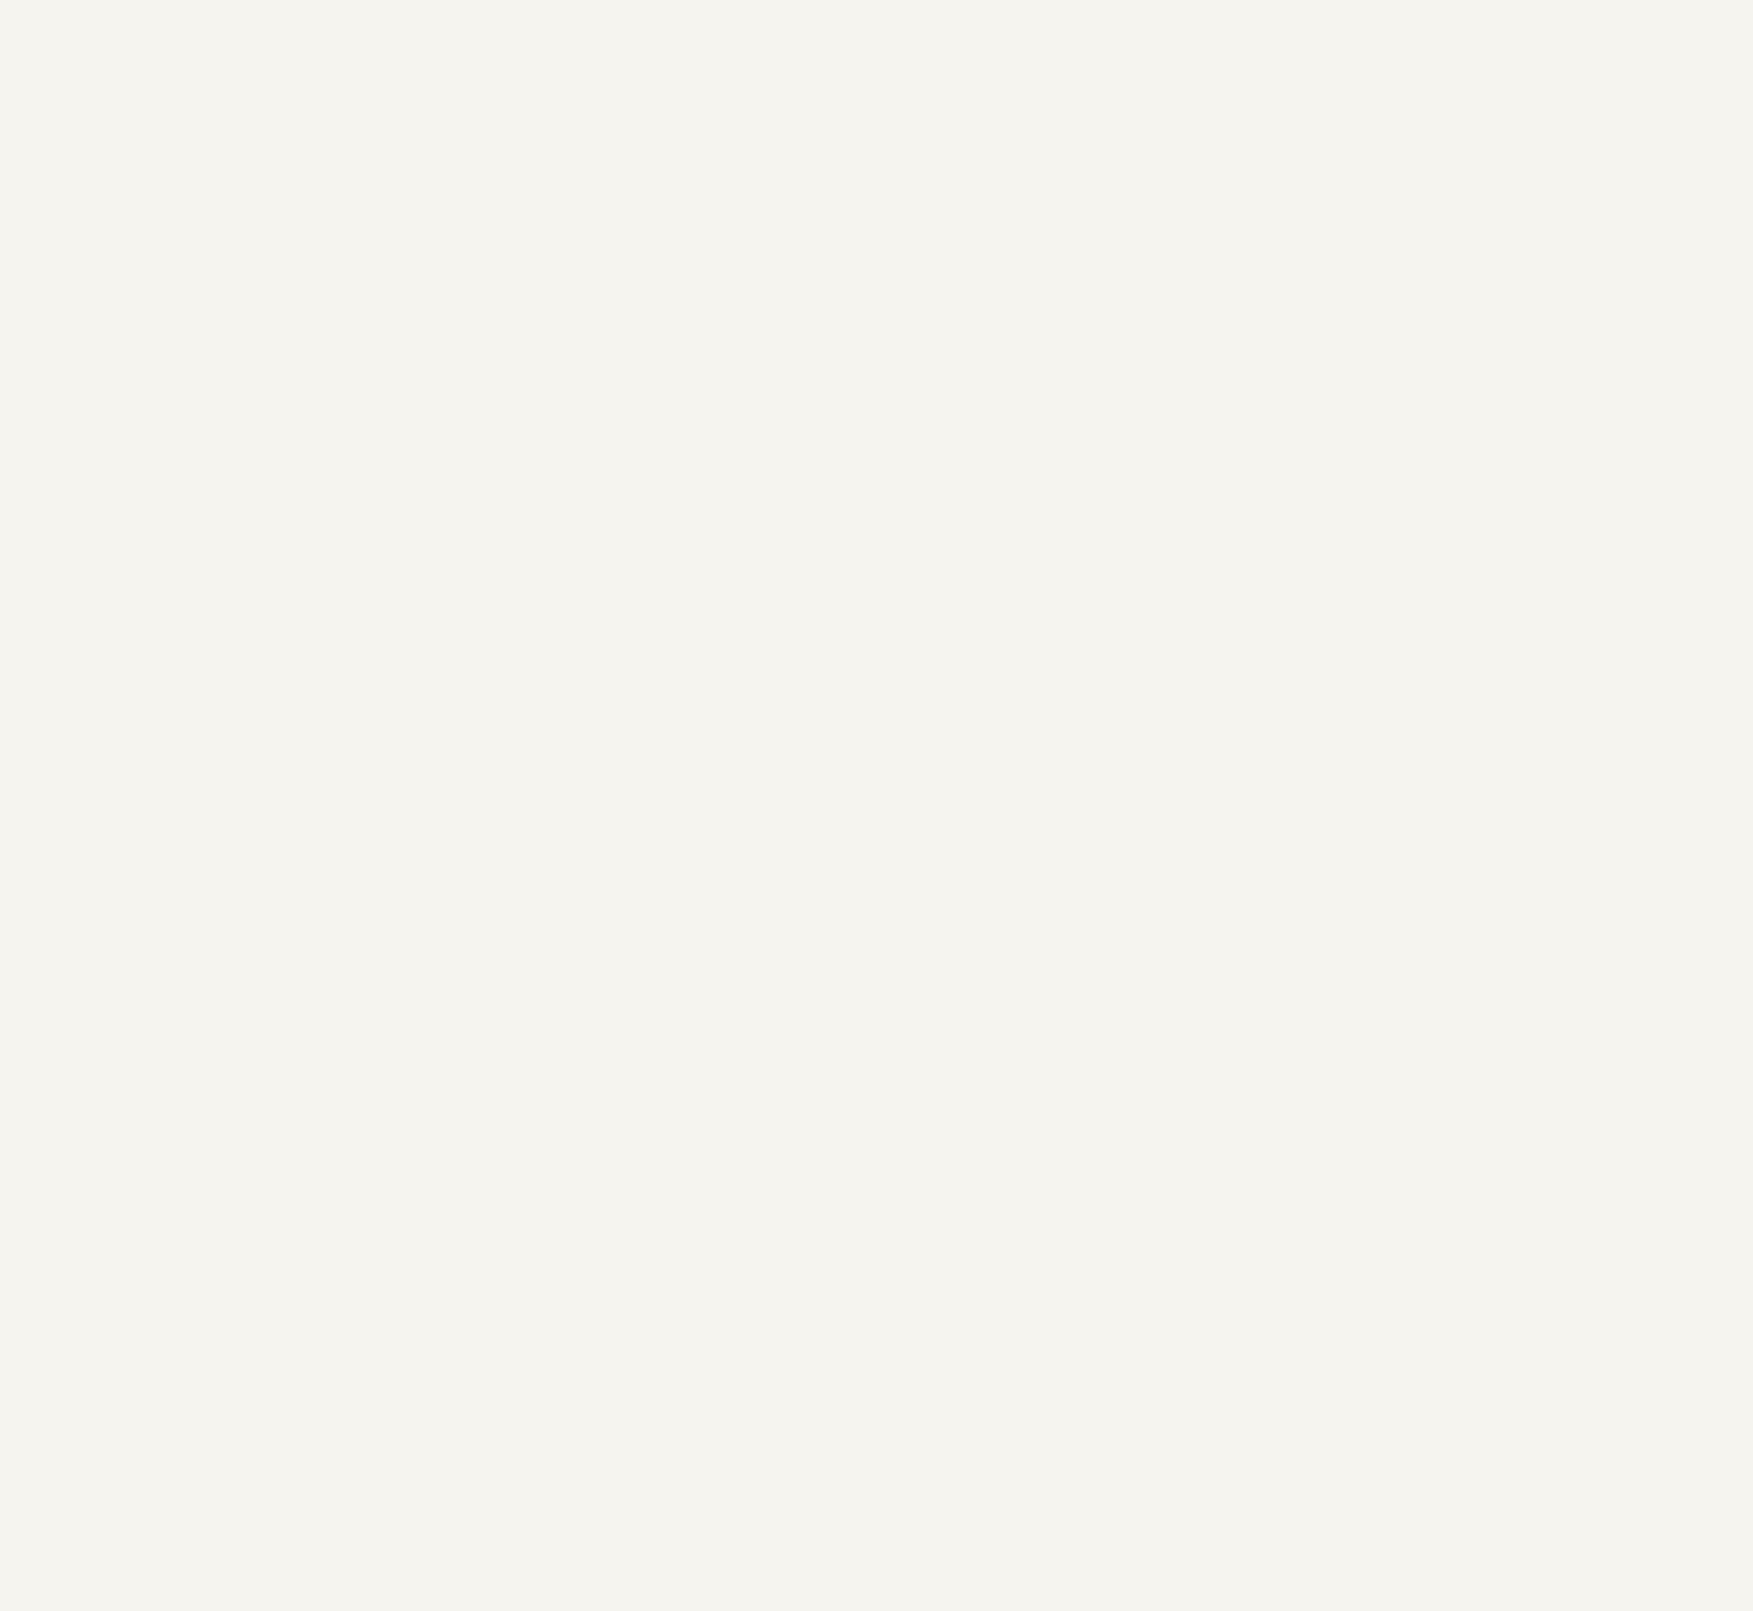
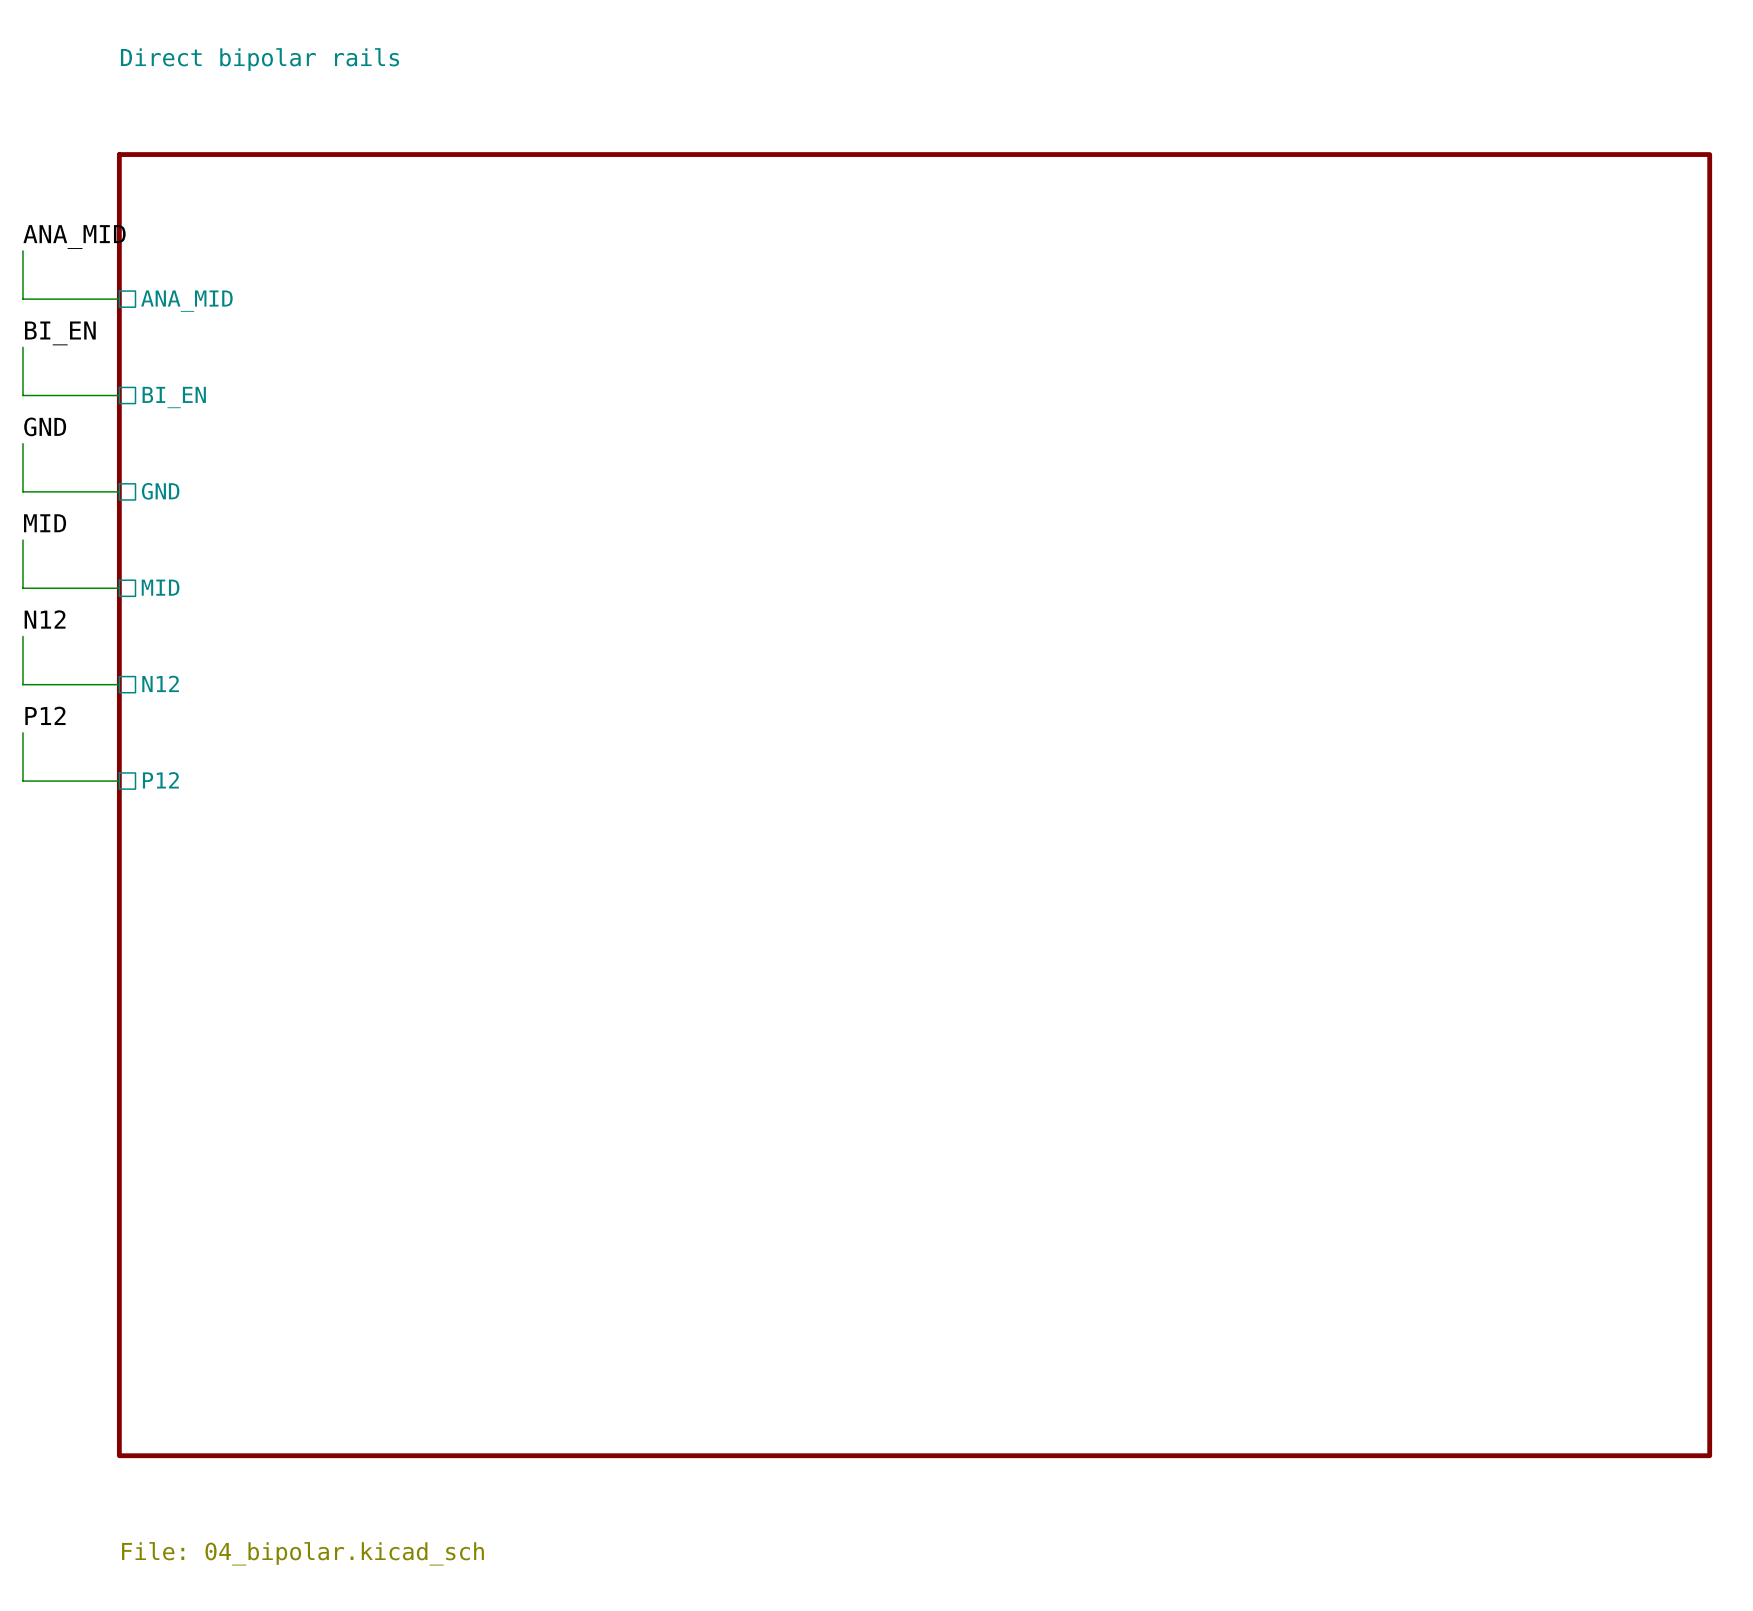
label: none -> ANA_MID (74, 237)
wire: none -> (22, 250) (22, 299) (119, 299)
sheet pin: none -> ANA_MID (186, 301)
label: none -> BI_EN (60, 333)
wire: none -> (22, 347) (22, 395) (119, 395)
sheet pin: none -> BI_EN (174, 397)
label: none -> GND (45, 426)
wire: none -> (22, 443) (22, 491) (119, 491)
sheet pin: none -> GND (160, 491)
label: none -> MID (45, 523)
wire: none -> (22, 540) (22, 588) (119, 588)
sheet pin: none -> MID (160, 587)
label: none -> N12 (45, 619)
wire: none -> (22, 636) (22, 684) (119, 684)
sheet pin: none -> N12 (160, 683)
label: none -> P12 (45, 715)
wire: none -> (22, 732) (22, 781) (119, 781)
sheet pin: none -> P12 (160, 780)
sheet Direct bipolar rails: none -> File: 04_bipolar.kicad_sch (914, 805)

